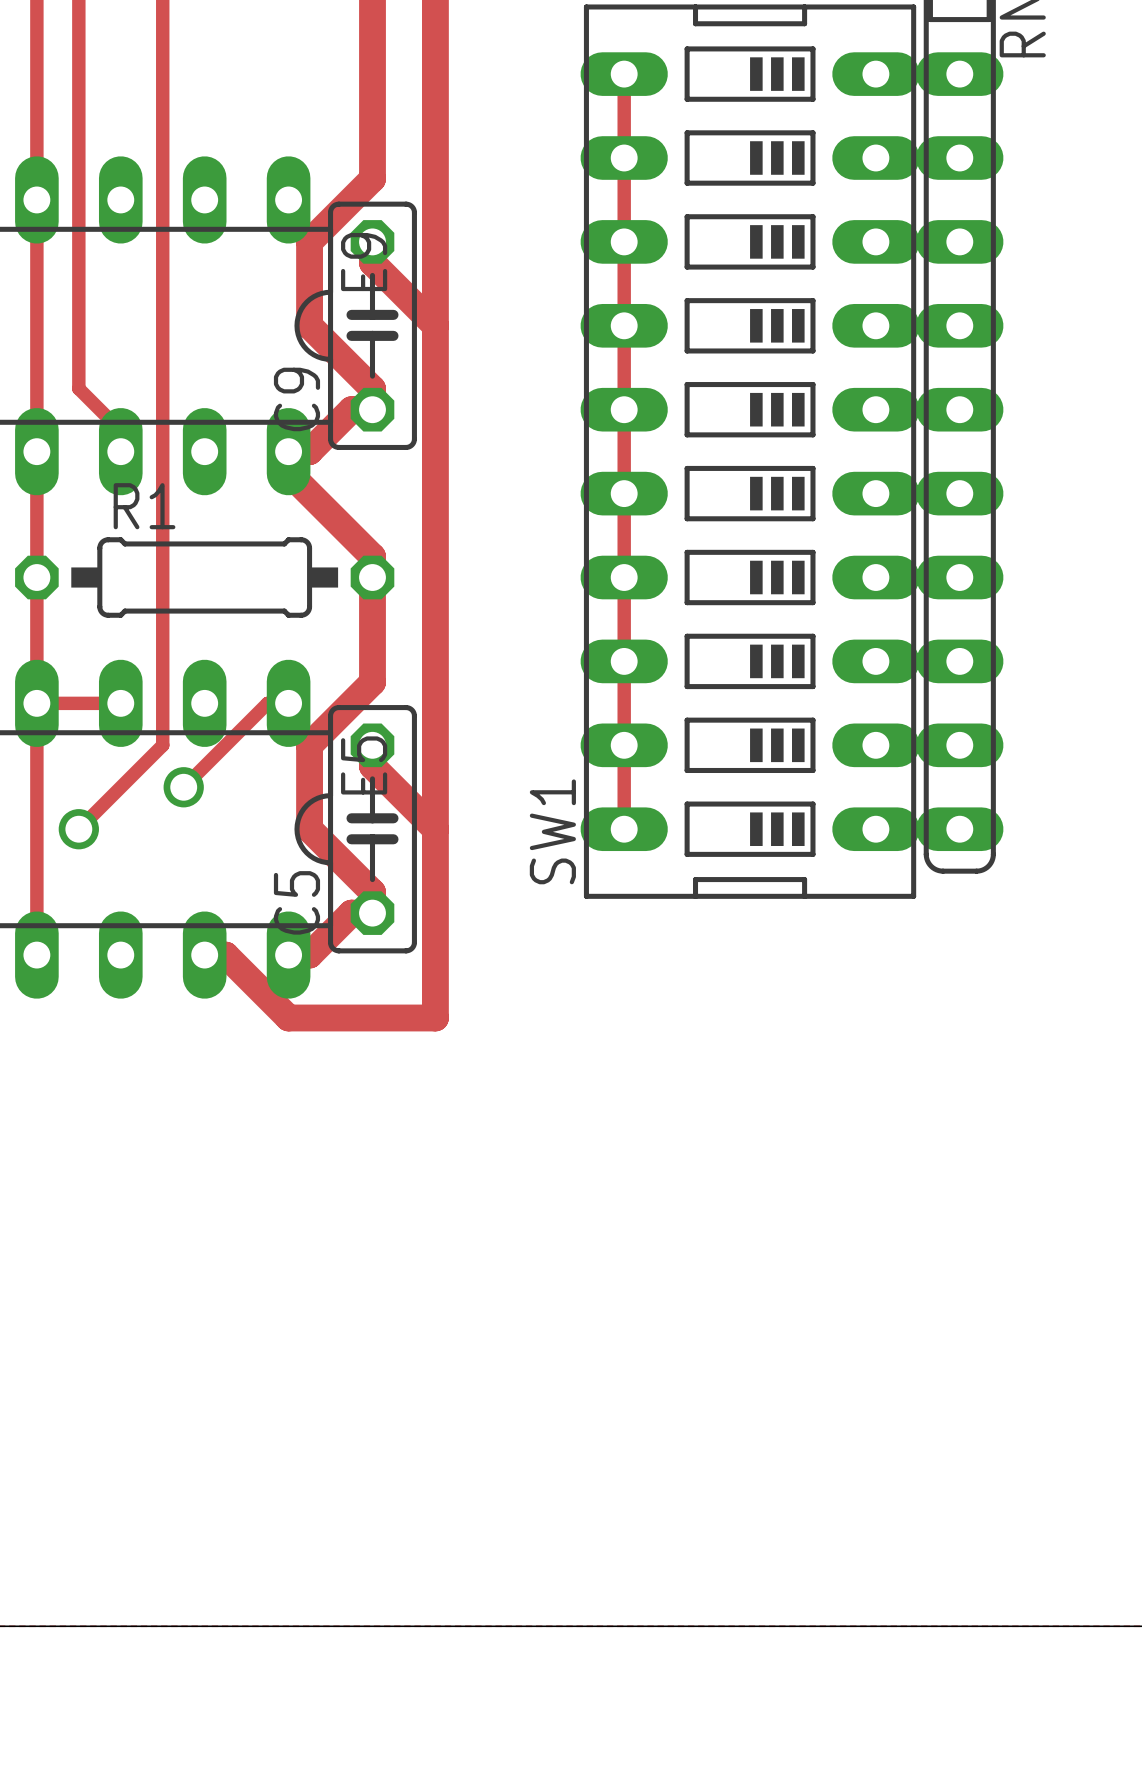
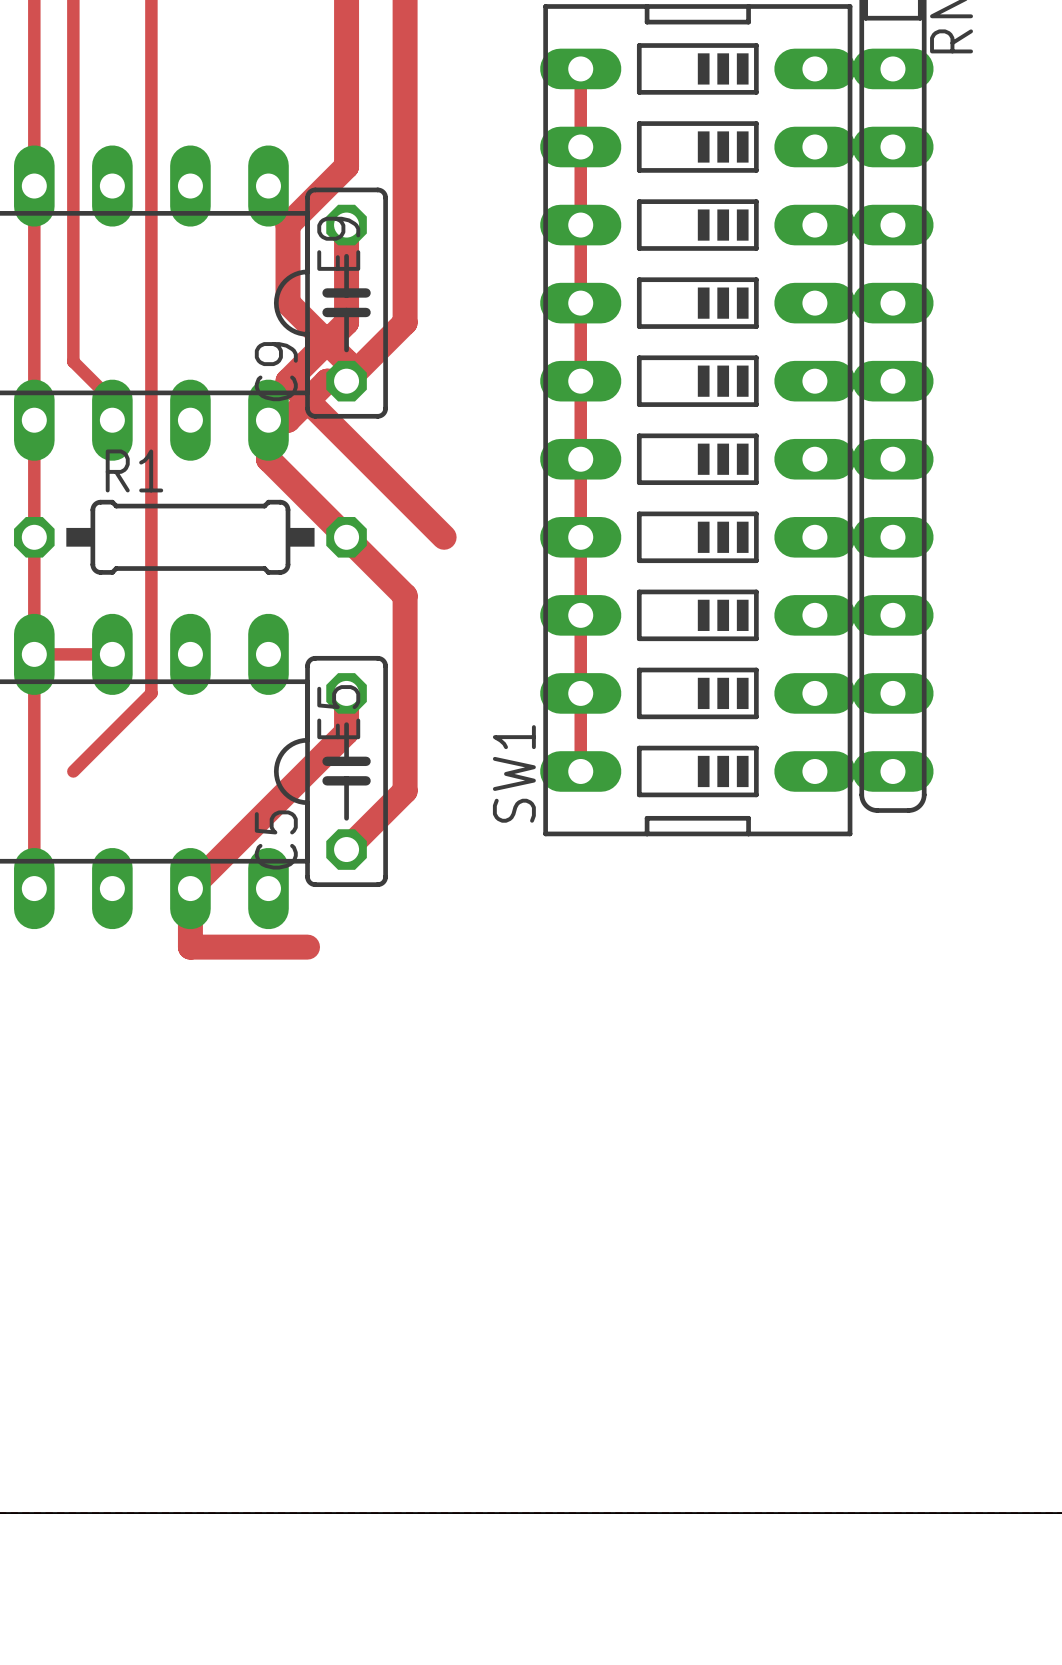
track: (372, 262) (435, 325) -> (346, 244) (346, 322) (288, 381) (444, 537)
track: (435, 346) (435, 640) -> (268, 439) (268, 459) (405, 595)
track: none -> (405, 322) (346, 381)
track: (288, 472) (372, 556) (372, 682) (309, 745) (309, 829) (372, 892) (372, 913) (351, 913) (309, 955) (288, 955) -> none
track: (288, 703) (267, 703) (183, 787) -> none
track: (372, 766) (435, 829) -> (346, 712) (346, 732) (190, 888) (190, 947) (268, 947)
via: (183, 787) -> none
via: (78, 829) -> none
track: (435, 850) (435, 1017) (330, 1017) -> (405, 790) (346, 849)
track: (204, 955) (225, 955) (288, 1017) -> none

